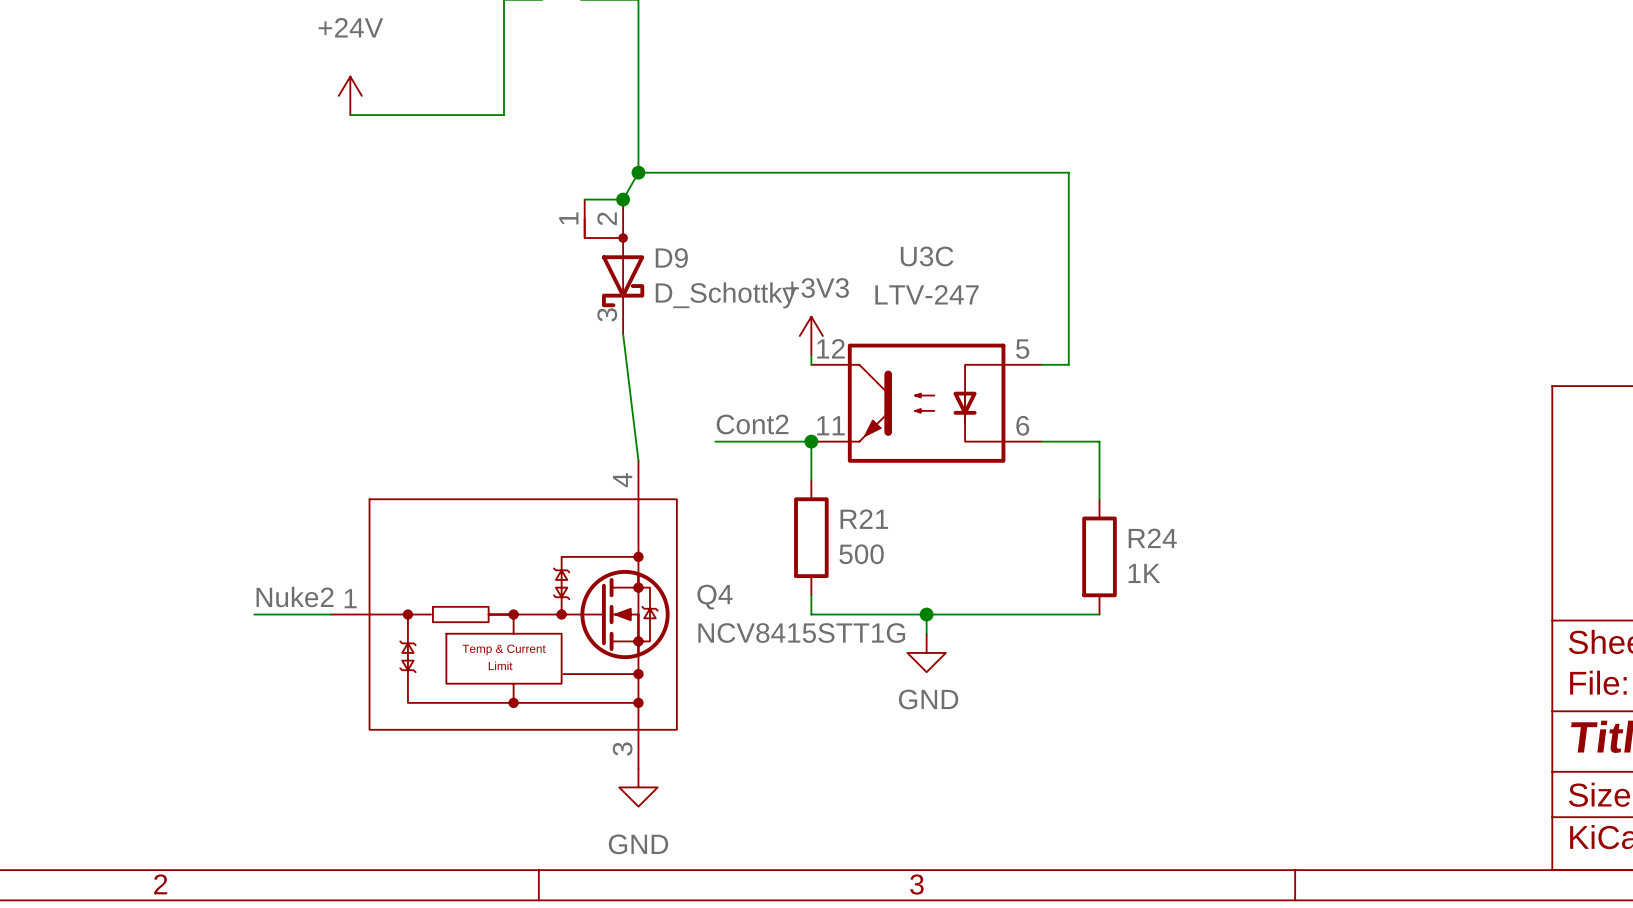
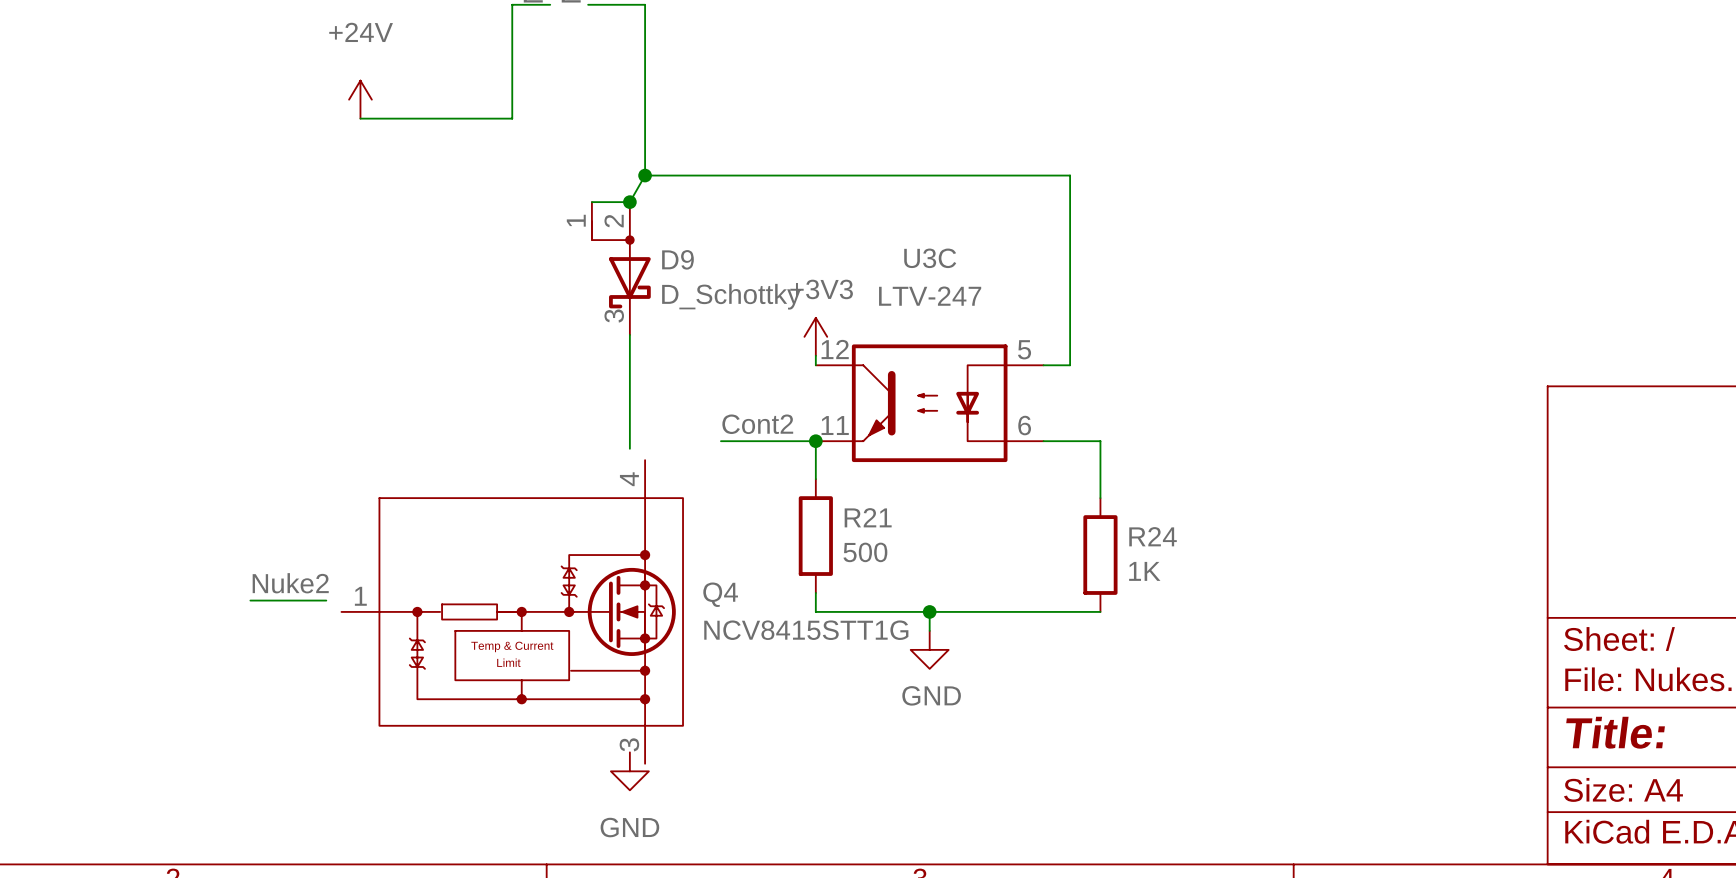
wire: (623, 334) (638, 460) -> (629, 334) (629, 448)
label position: Nuke2 (295, 597) -> Nuke2 (290, 583)
wire: (254, 614) (331, 614) -> (250, 600) (326, 600)
power symbol position: GND (638, 787) -> GND (629, 771)

